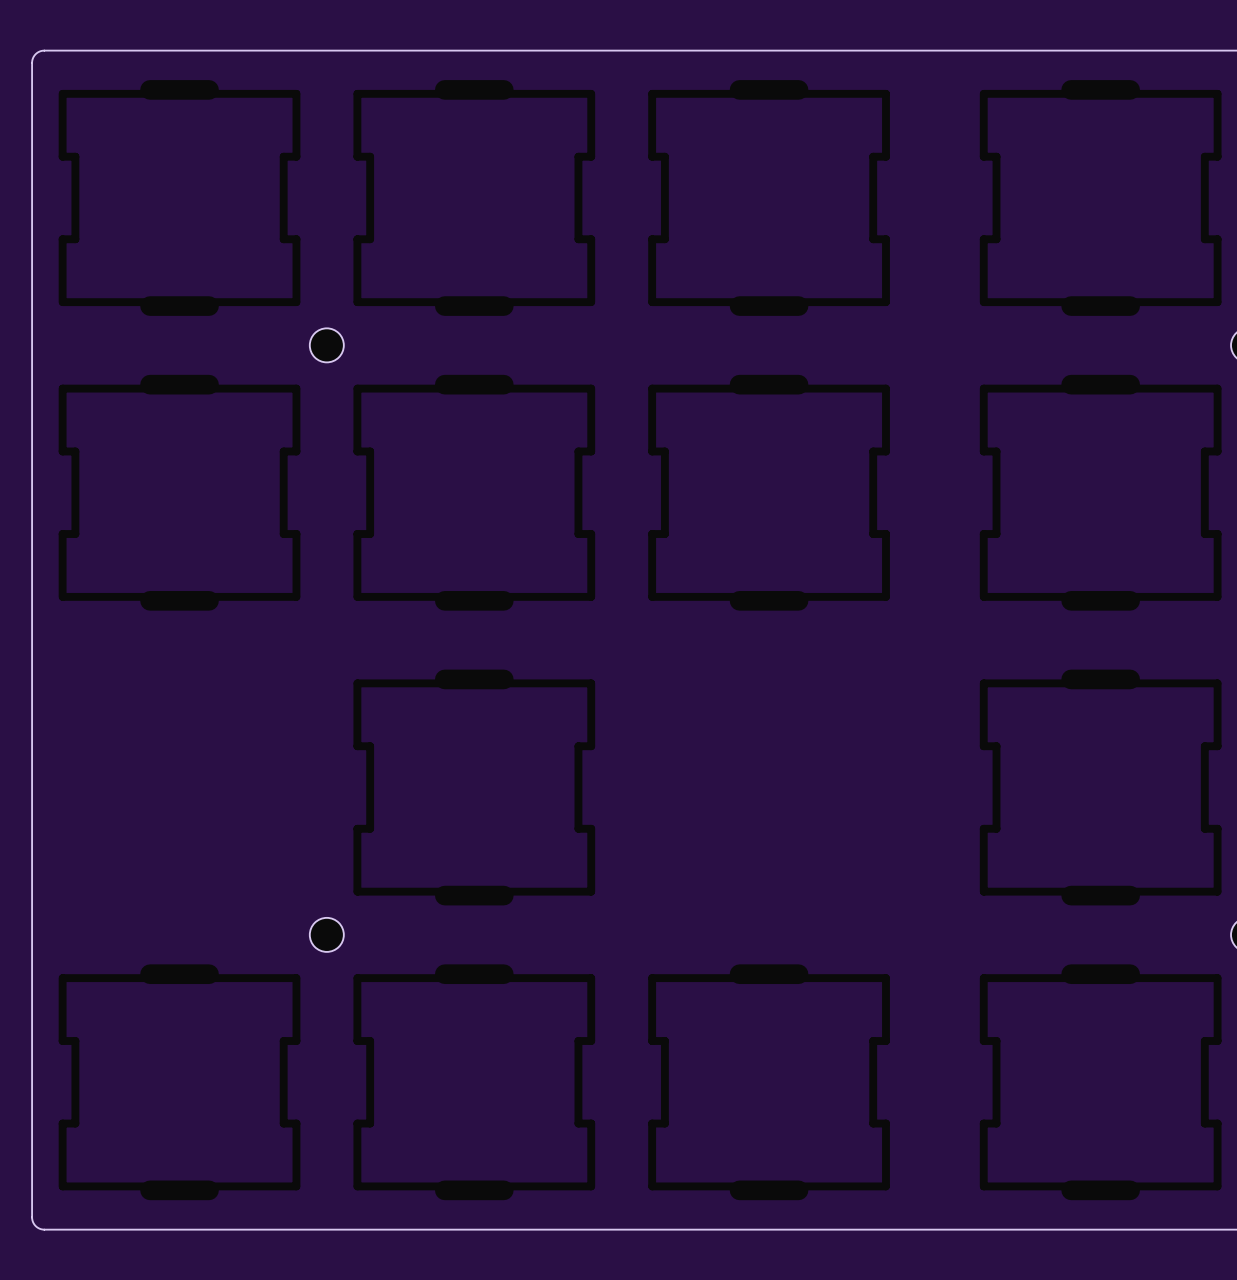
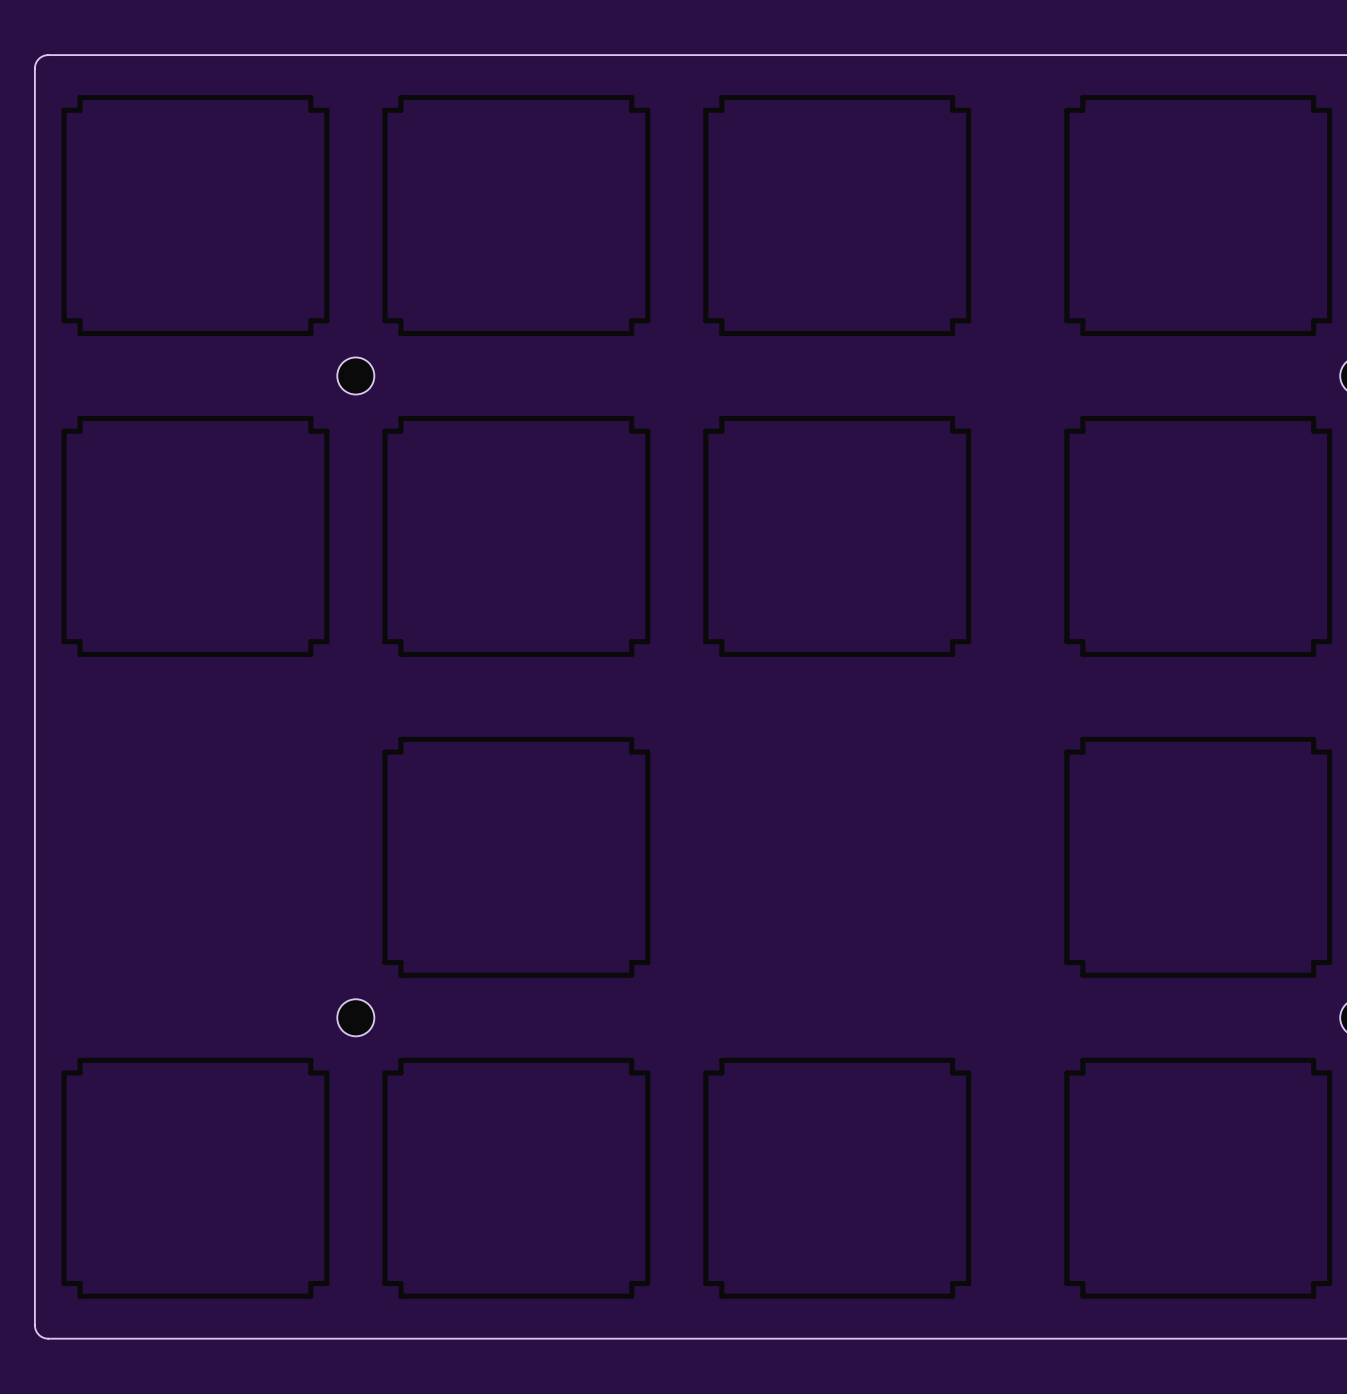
part footprint: [58, 80, 301, 316] -> [61, 95, 330, 336]
part footprint: [353, 80, 596, 316] -> [382, 95, 651, 336]
part footprint: [648, 80, 890, 316] -> [703, 95, 972, 336]
part footprint: [979, 80, 1222, 316] -> [1064, 95, 1333, 336]
part footprint: [58, 374, 301, 611] -> [61, 416, 330, 657]
part footprint: [353, 374, 596, 611] -> [382, 416, 651, 657]
part footprint: [648, 374, 890, 611] -> [703, 416, 972, 657]
part footprint: [979, 374, 1222, 611] -> [1064, 416, 1333, 657]
part footprint: [353, 669, 596, 906] -> [382, 736, 651, 978]
part footprint: [979, 669, 1222, 906] -> [1064, 736, 1333, 978]
part footprint: [58, 964, 301, 1201] -> [61, 1057, 330, 1299]
part footprint: [353, 964, 596, 1201] -> [382, 1057, 651, 1299]
part footprint: [648, 964, 890, 1201] -> [703, 1057, 972, 1299]
part footprint: [979, 964, 1222, 1201] -> [1064, 1057, 1333, 1299]

